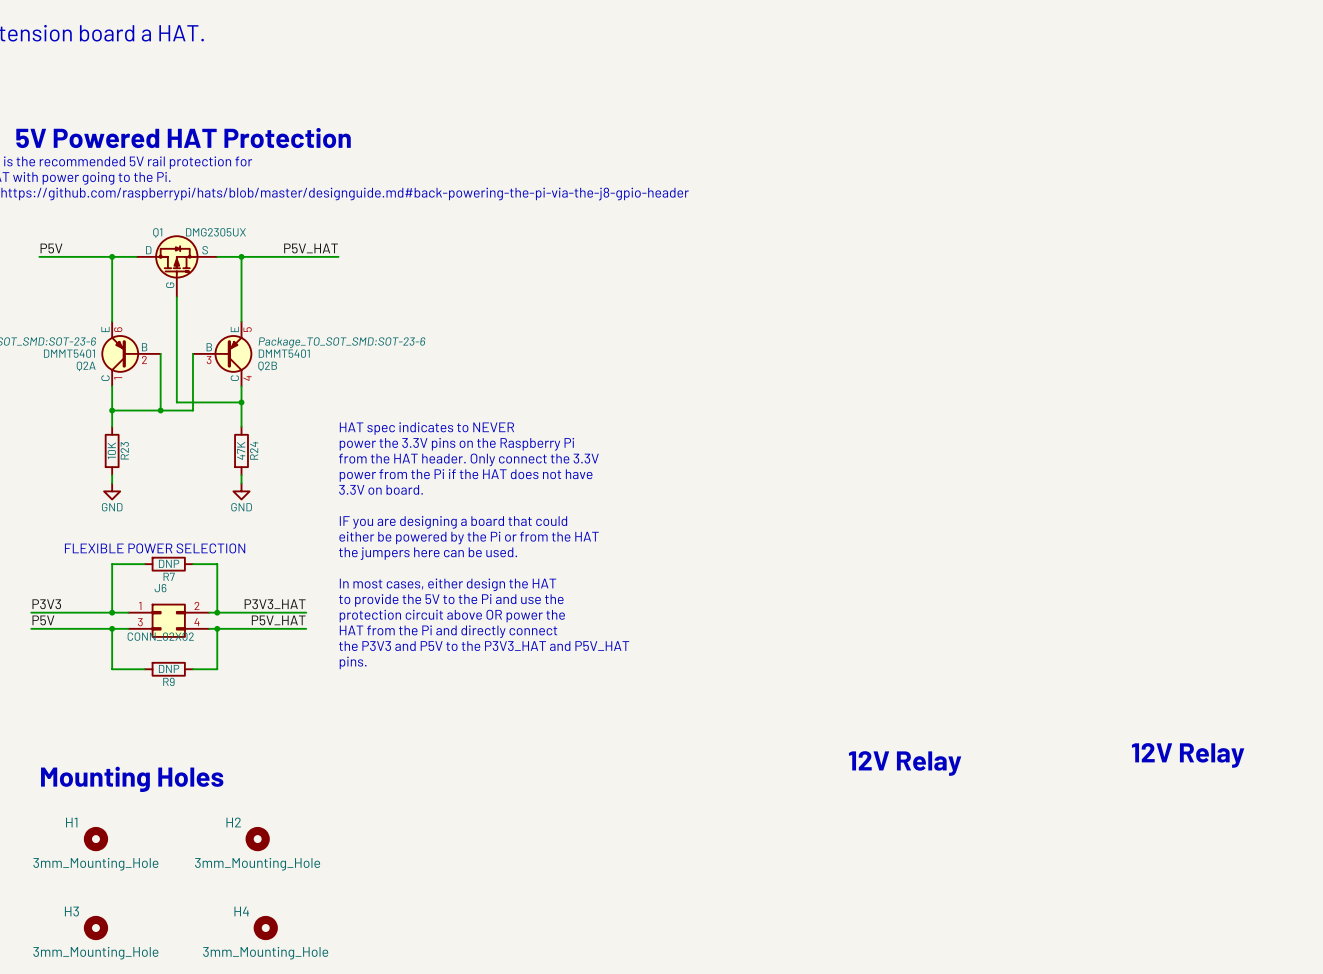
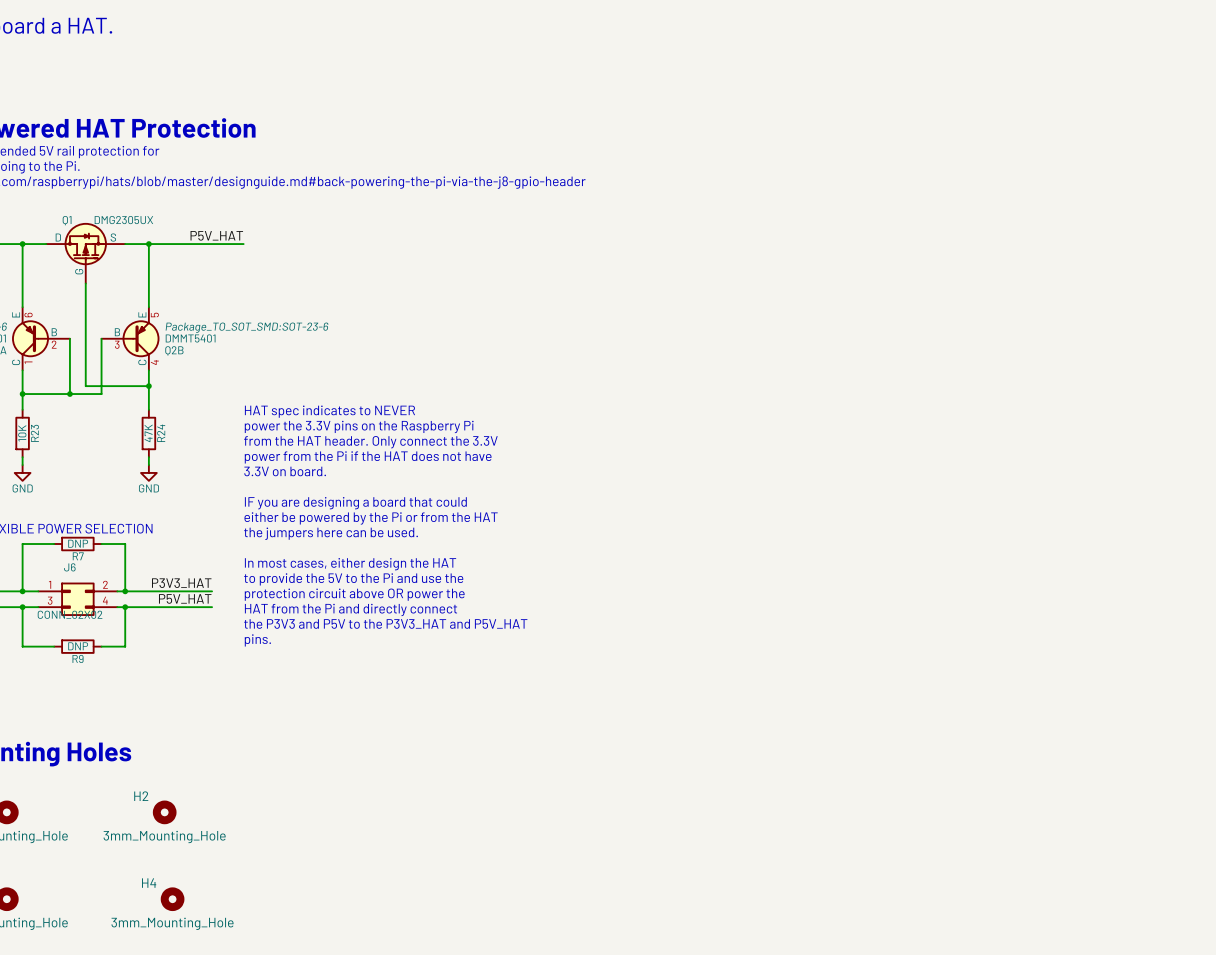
text: 12V Relay (1188, 755) -> none
text: 12V Relay (905, 763) -> none

